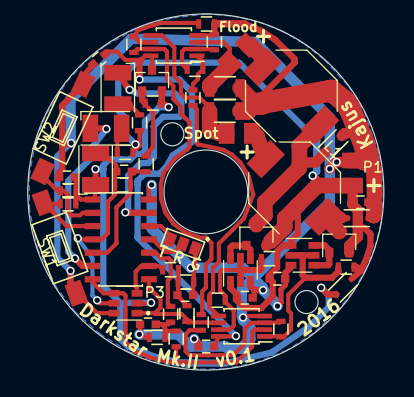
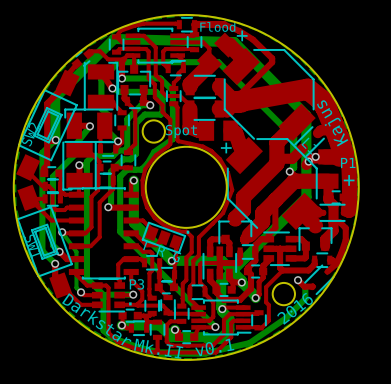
via: none -> (315, 156)
via: (336, 162) -> none
via: none -> (308, 161)
via: (329, 168) -> none

